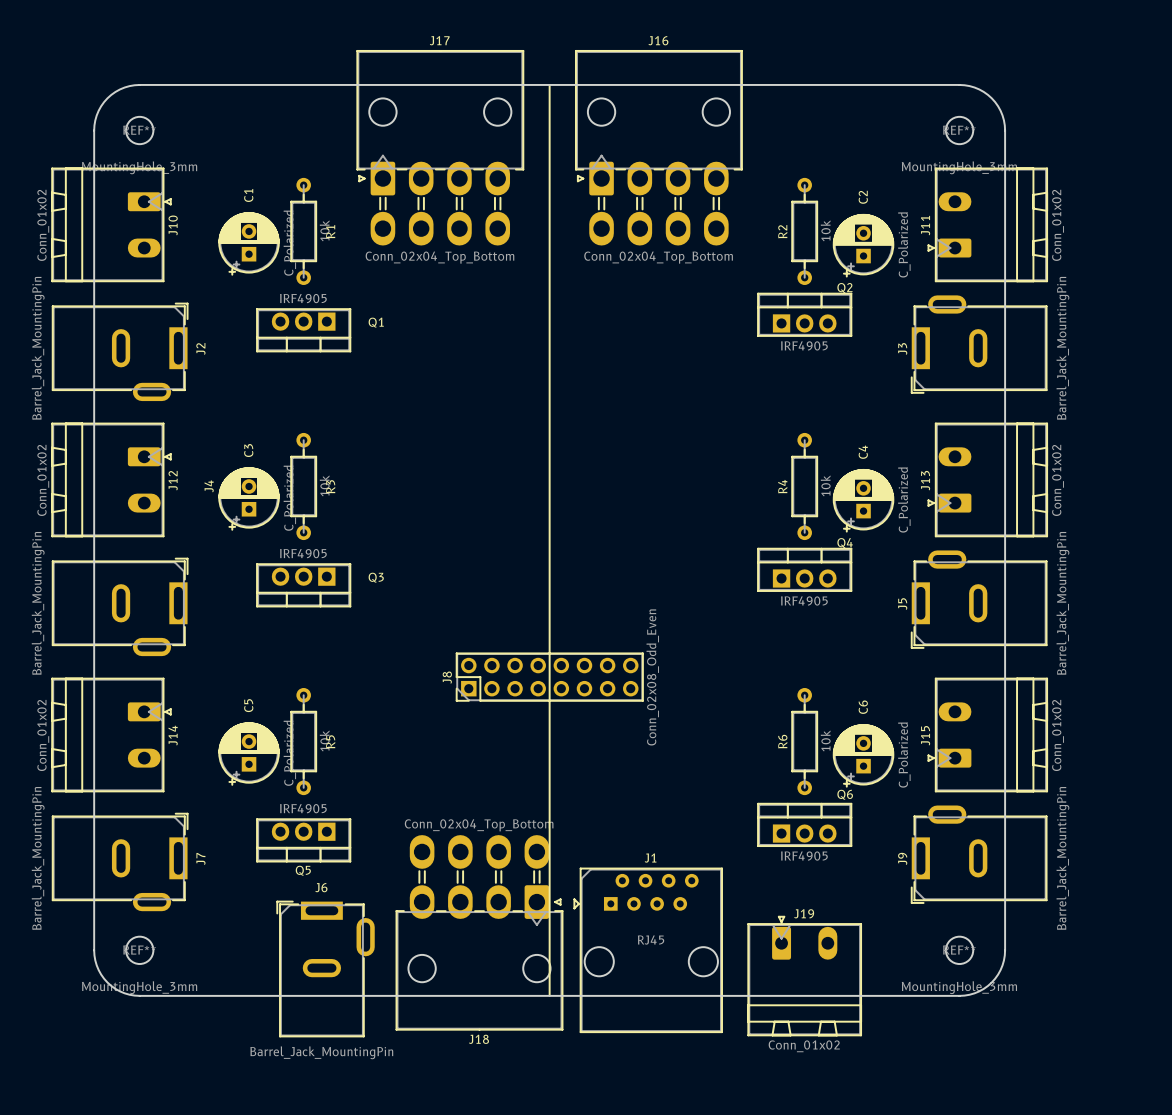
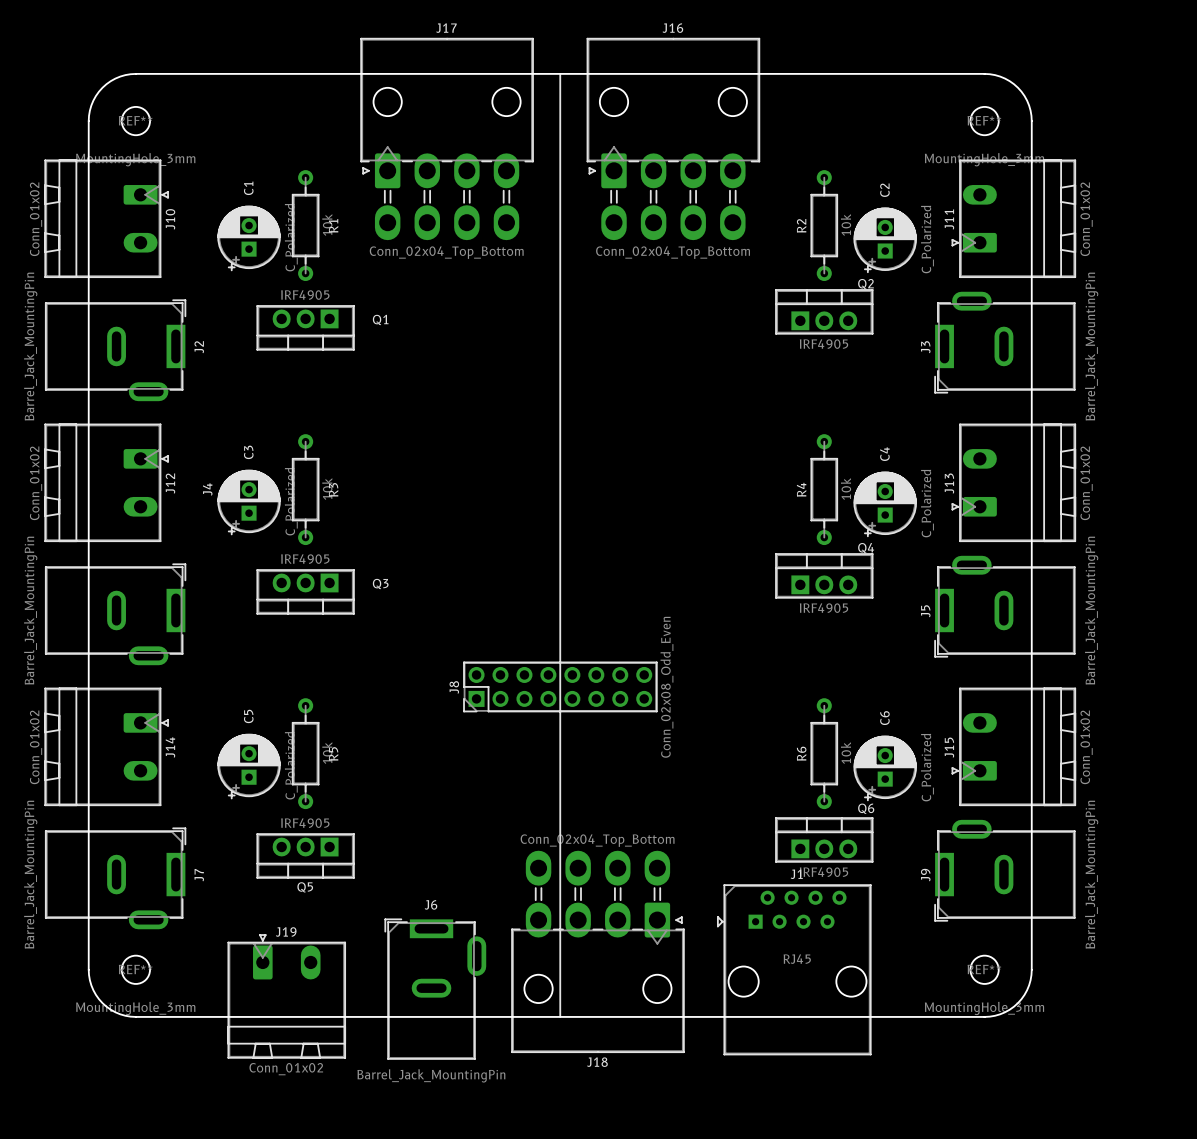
J18 position: (479, 932) -> (597, 951)
J1 position: (648, 950) -> (794, 969)
J6 position: (325, 969) -> (435, 989)
J19 position: (804, 976) -> (286, 996)

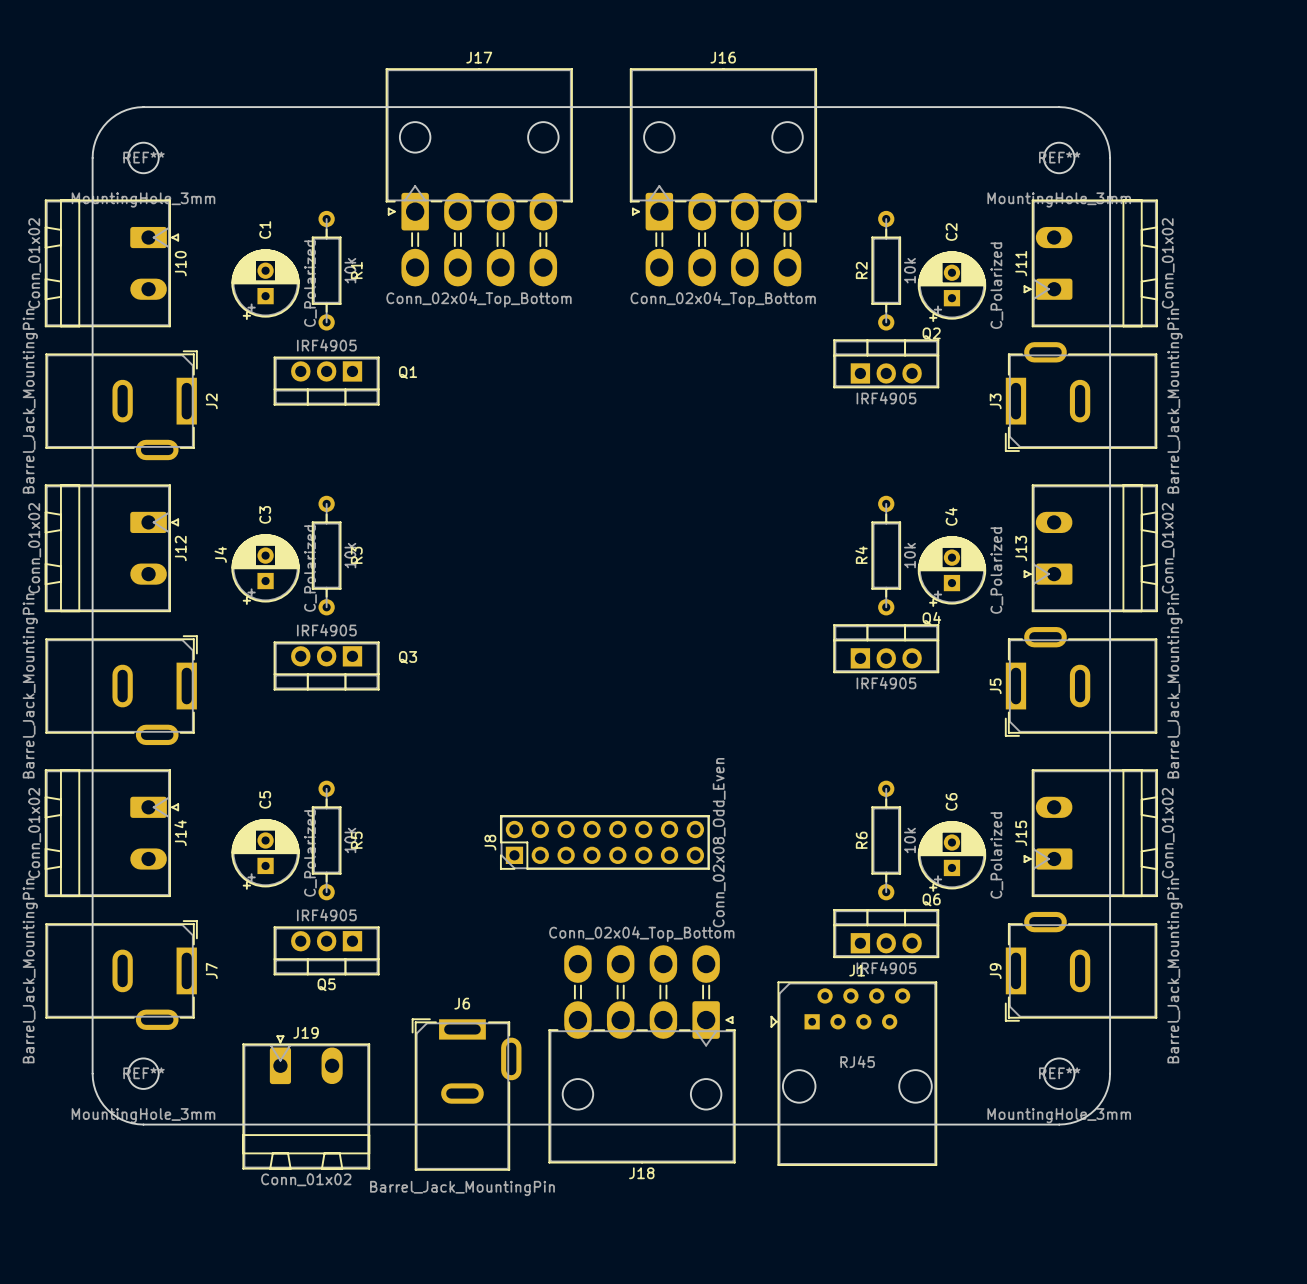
line: (560, 73) (560, 1016) -> none
J8 position: (560, 686) -> (604, 842)

